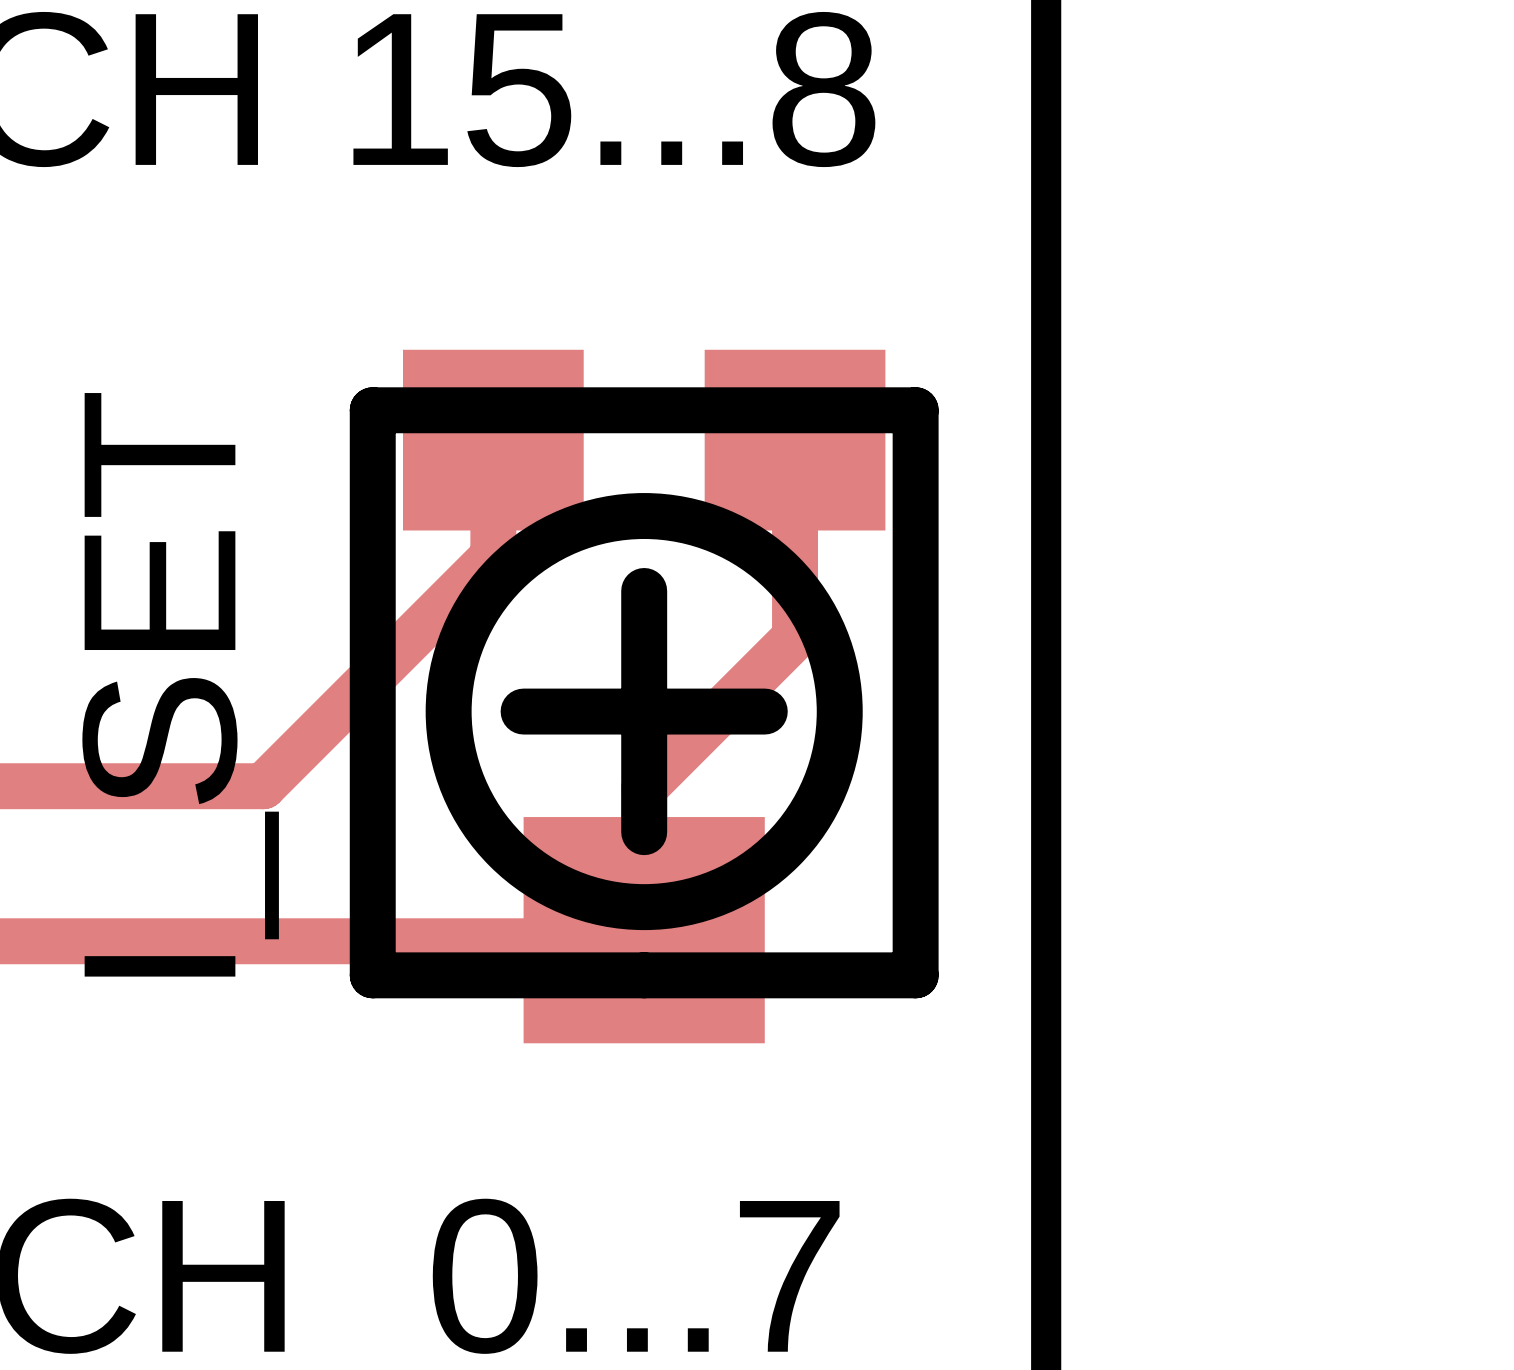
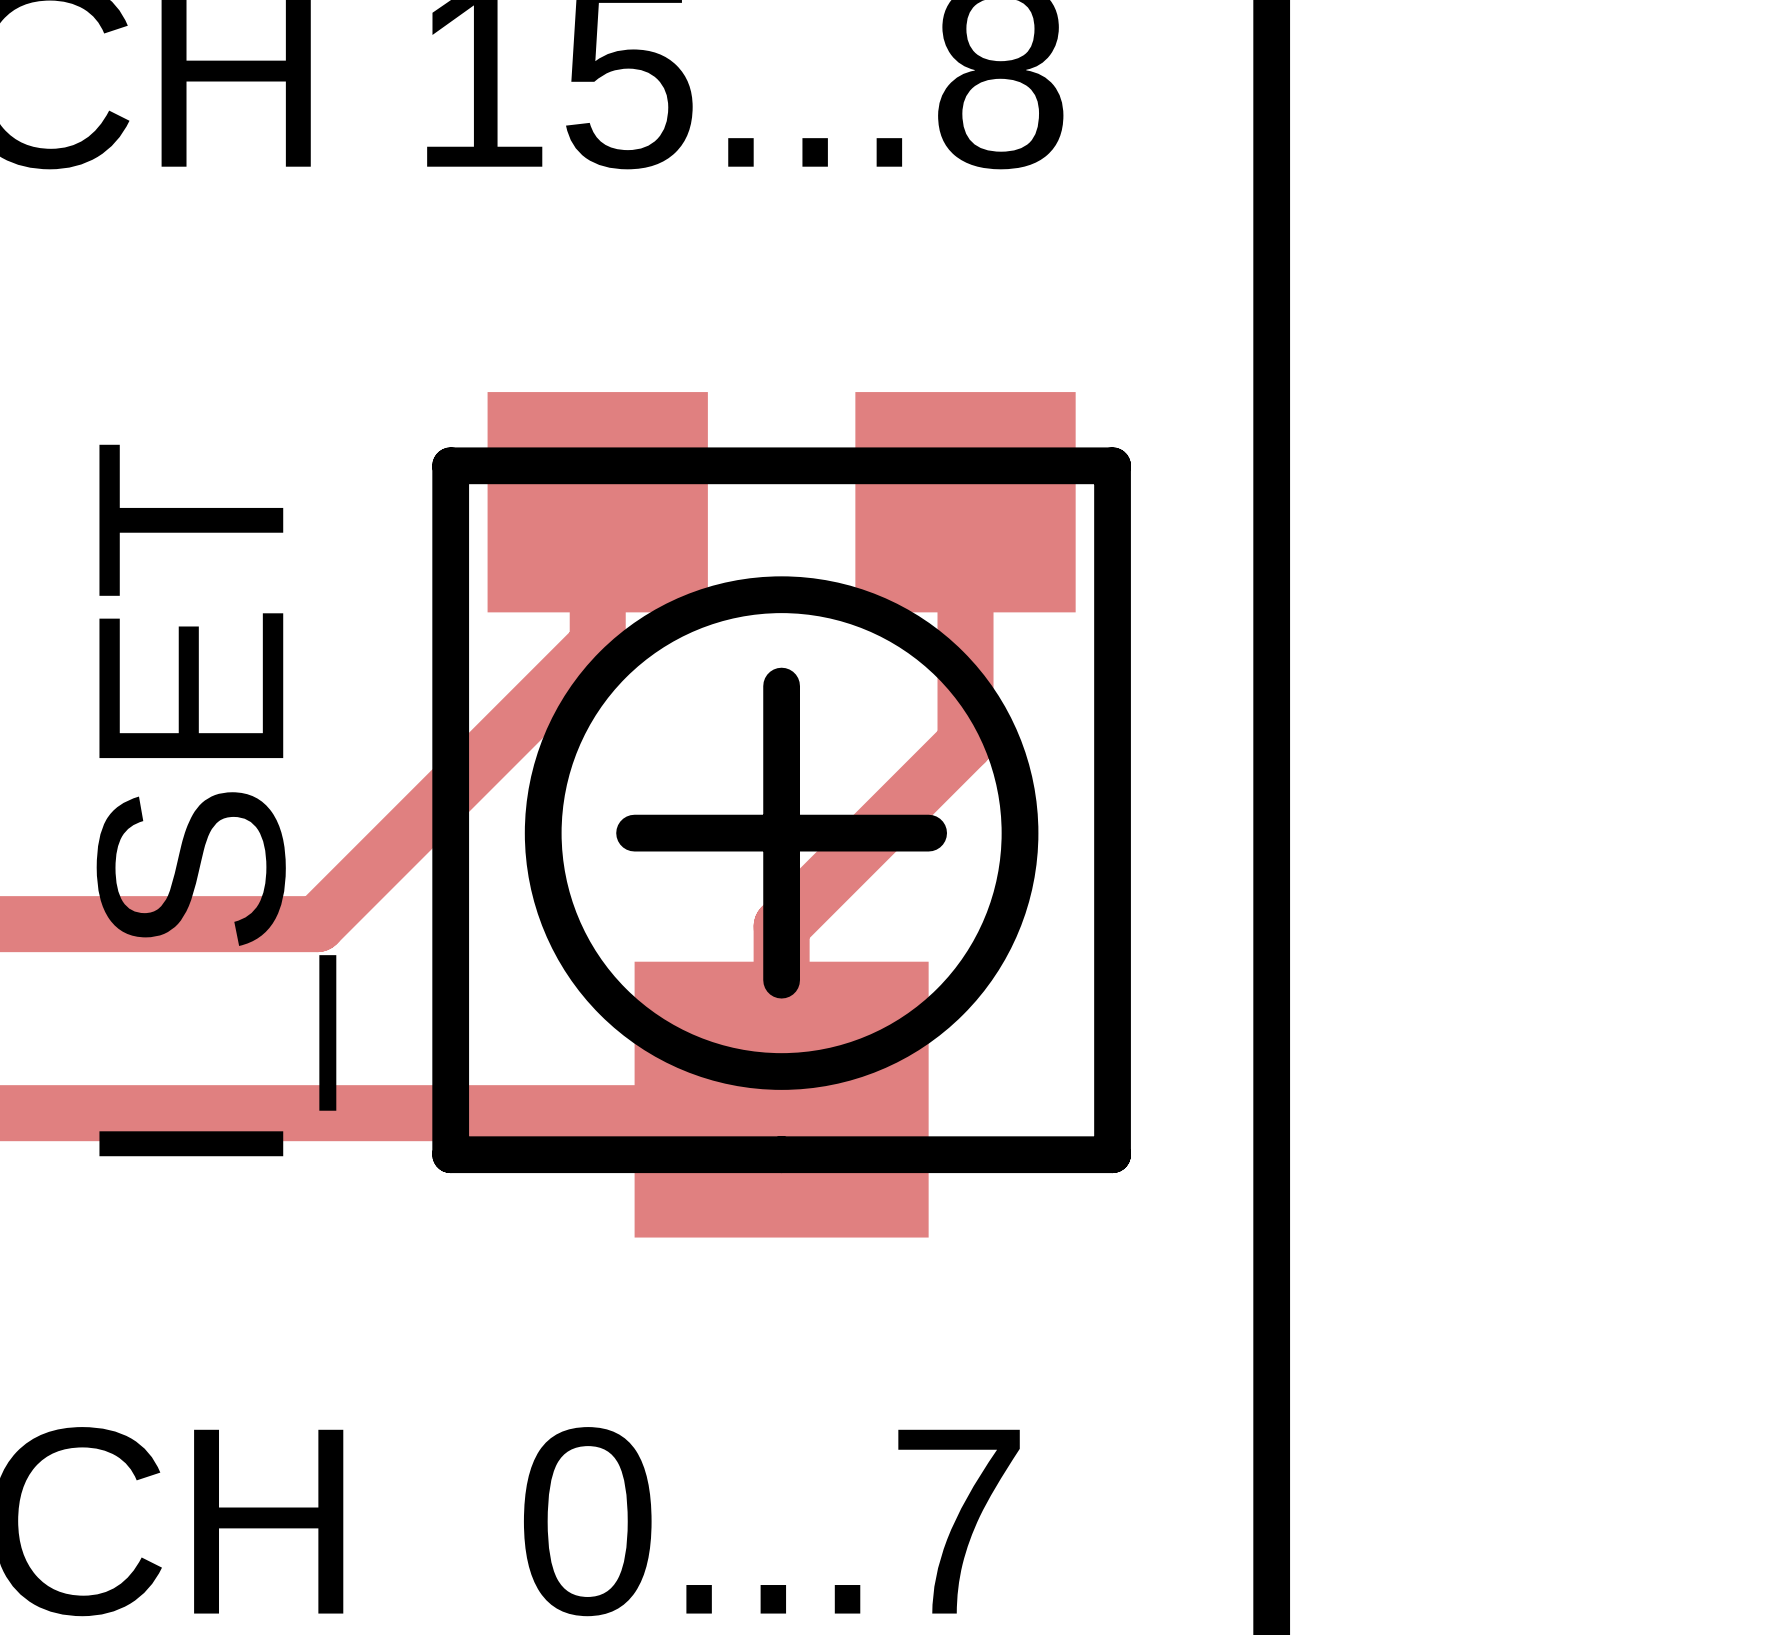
part footprint: [349, 349, 939, 1044] -> [432, 392, 1131, 1238]

